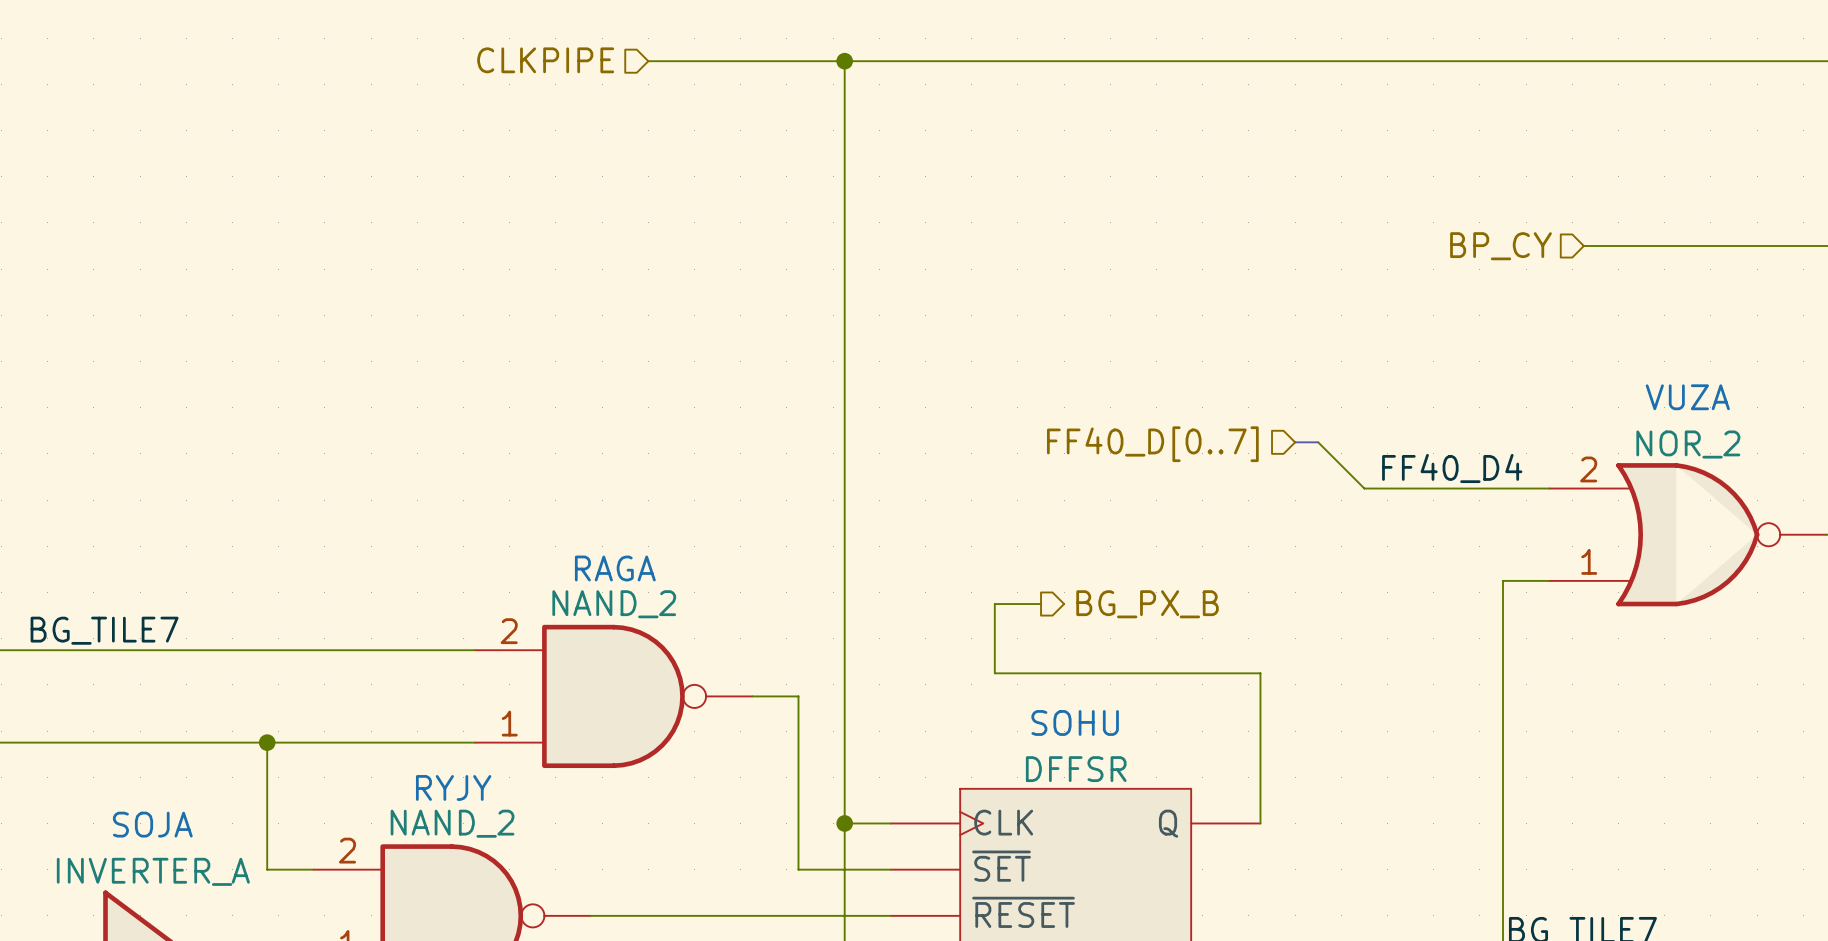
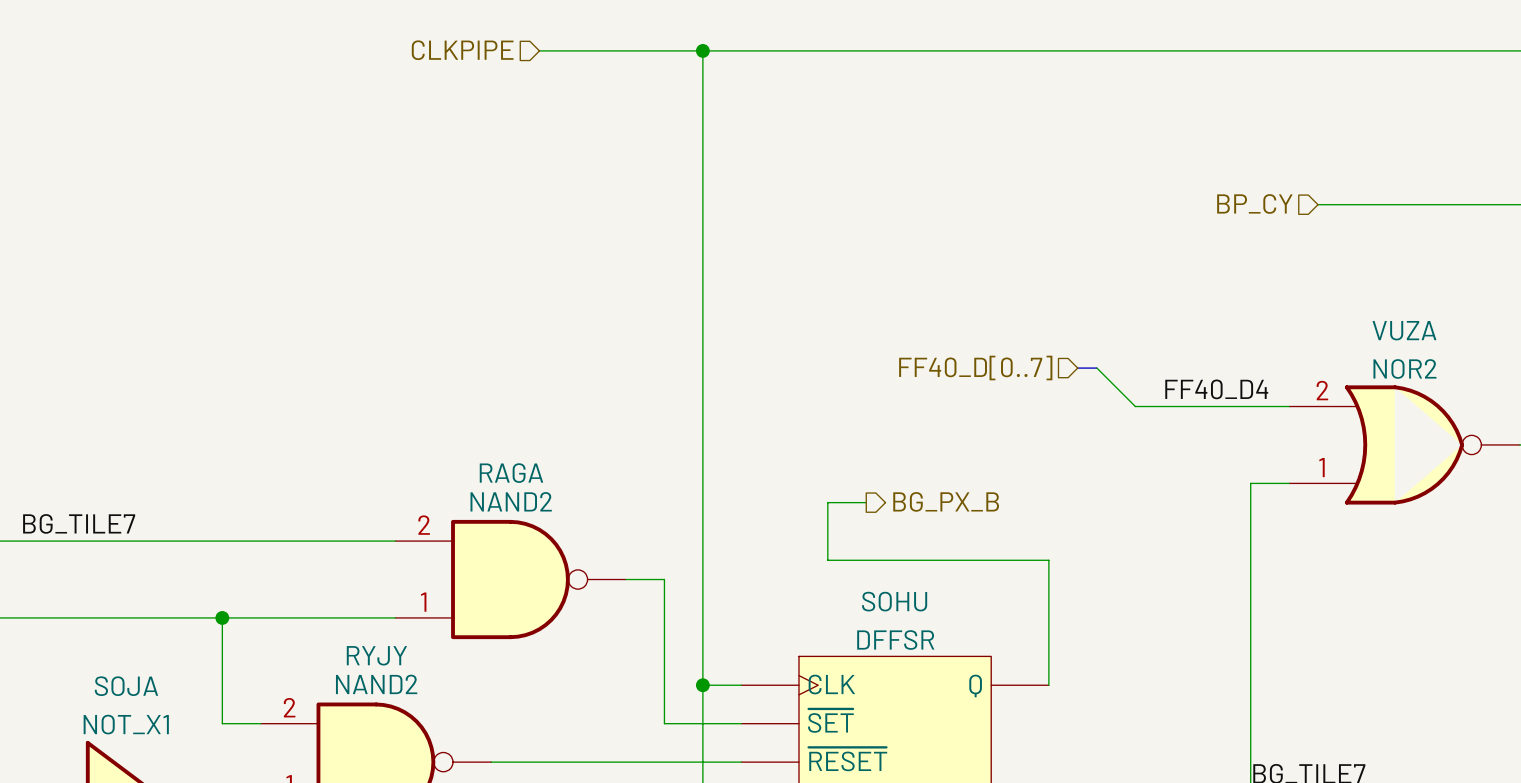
VUZA value: NOR_2 (1688, 444) -> NOR2 (1404, 368)
RAGA value: NAND_2 (614, 604) -> NAND2 (511, 501)
RYJY value: NAND_2 (452, 823) -> NAND2 (376, 684)
SOJA value: INVERTER_A (153, 871) -> NOT_X1 (126, 724)

